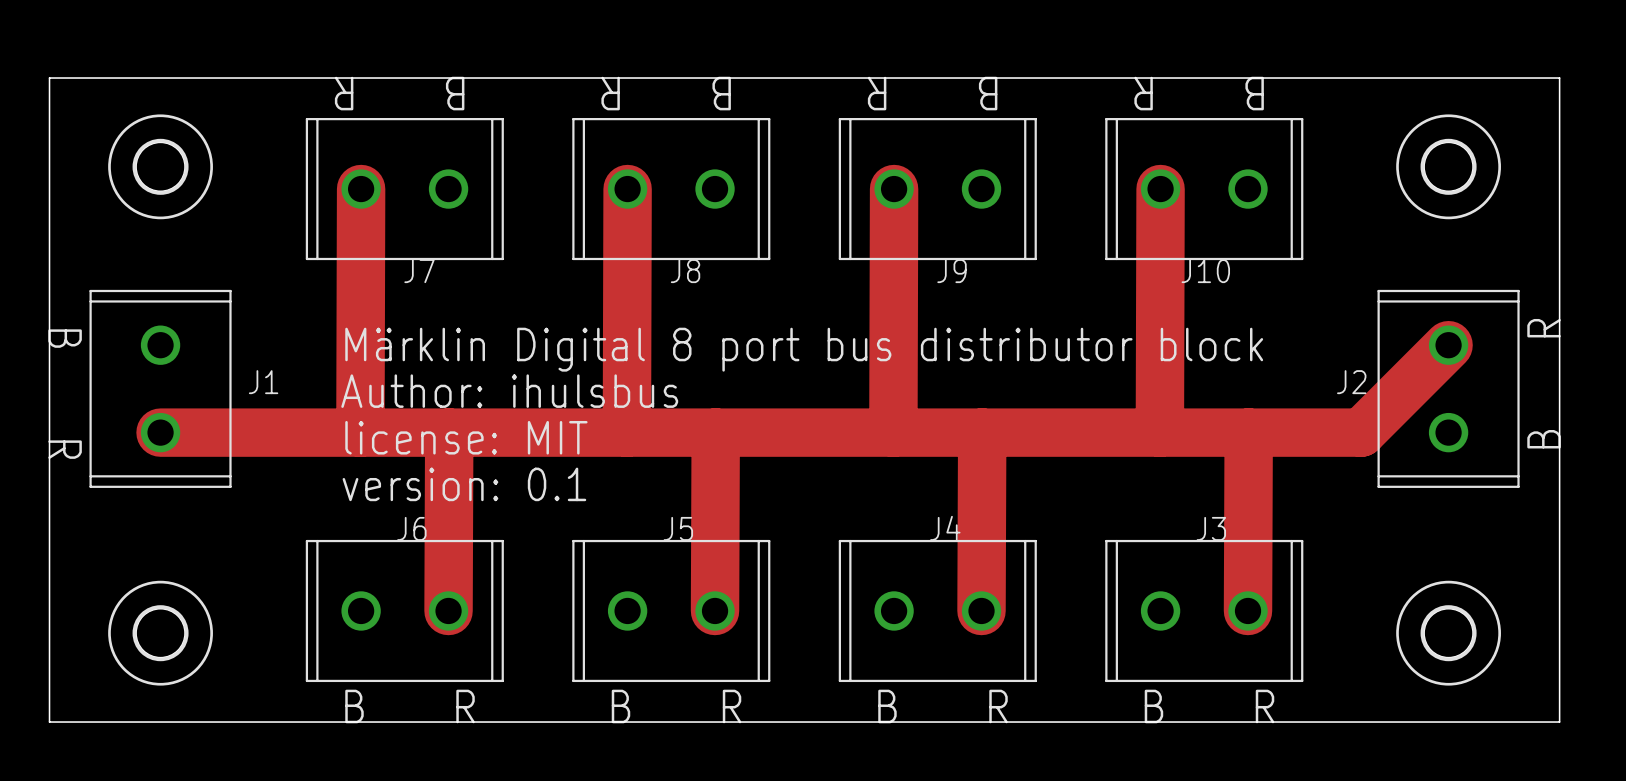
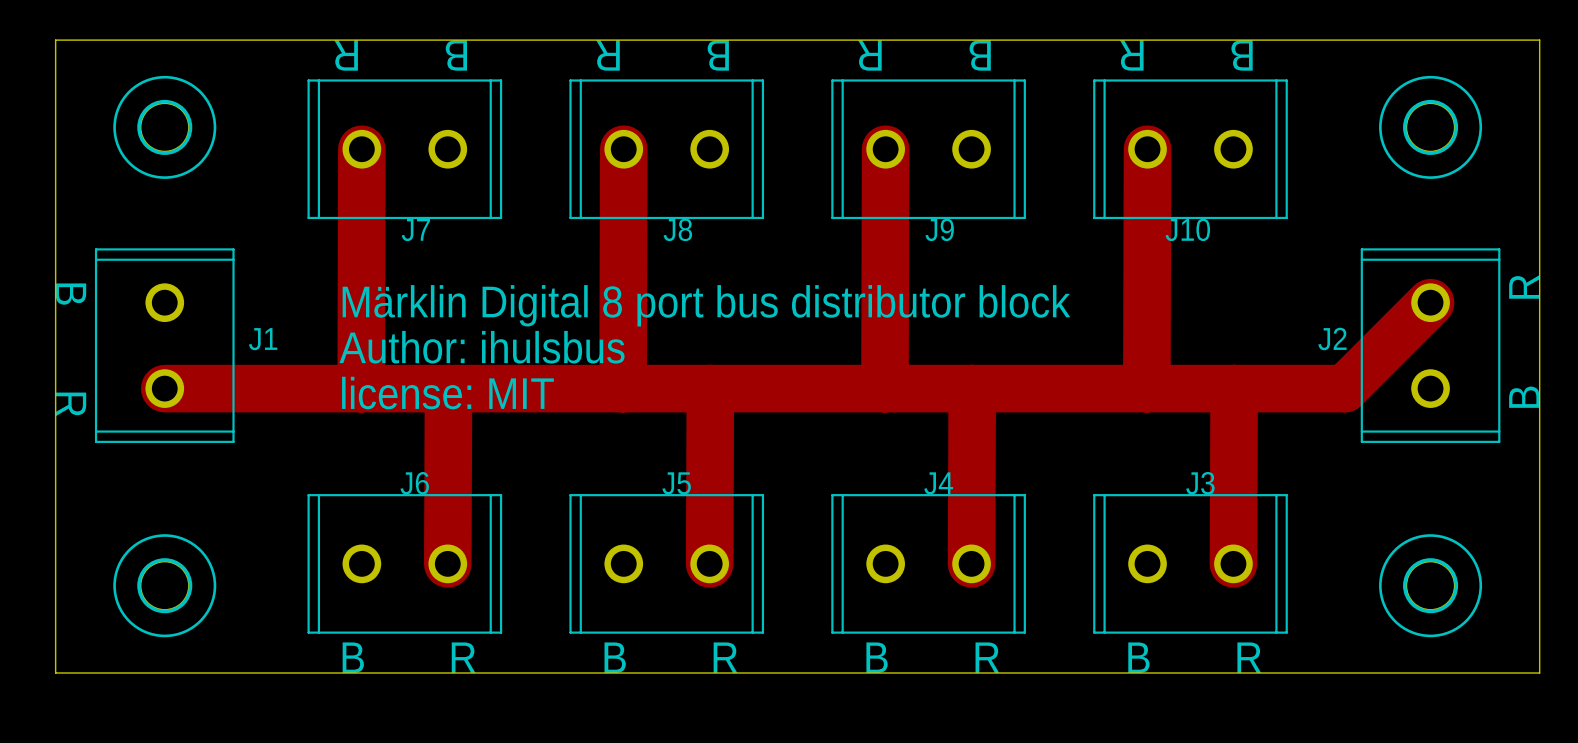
text: version: 0.1 (464, 484) -> none

